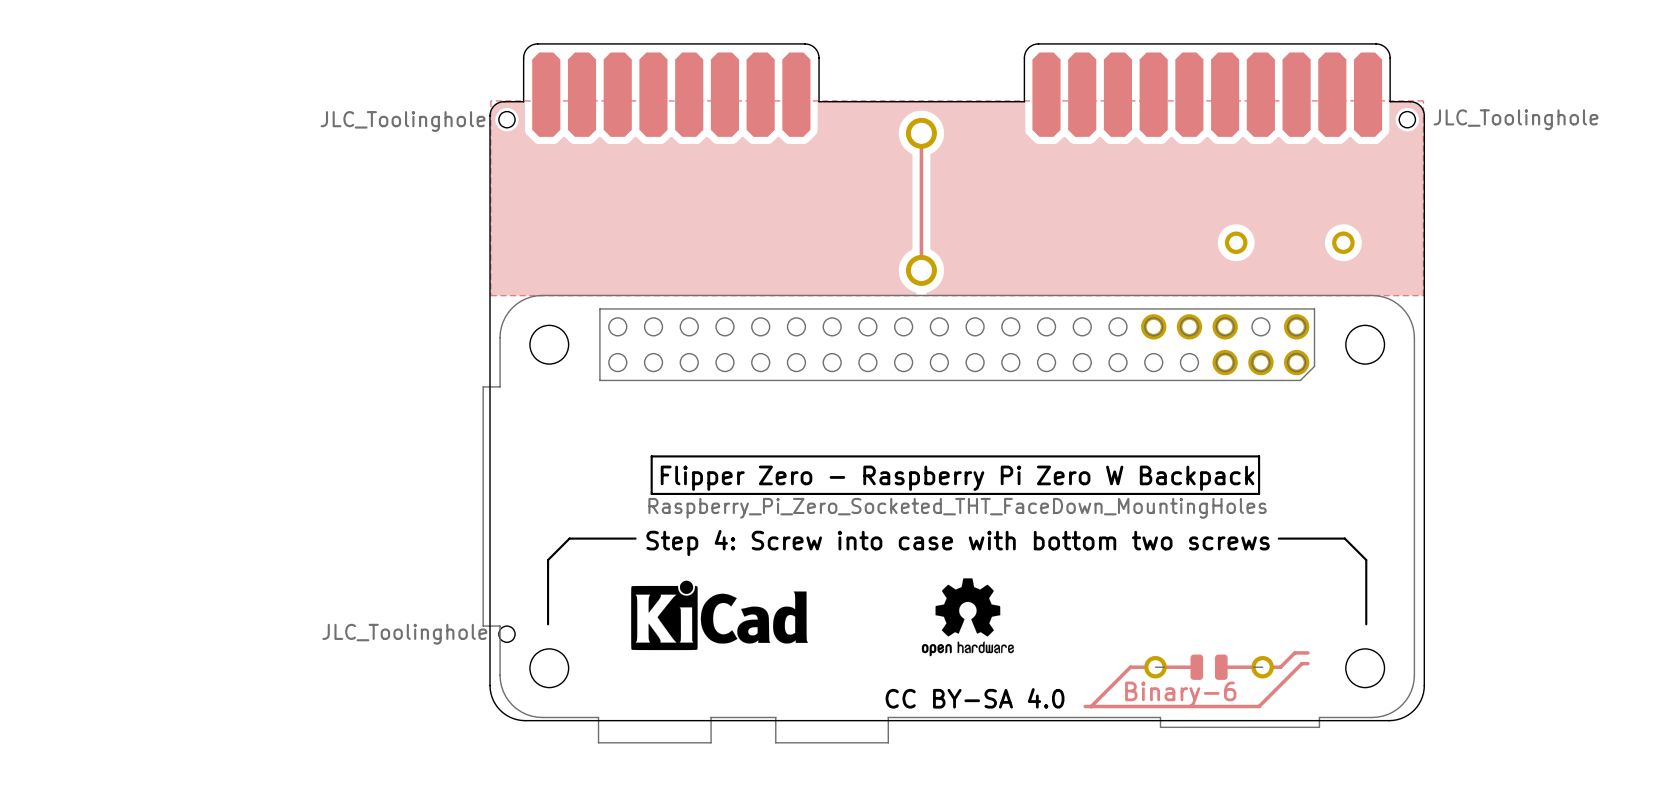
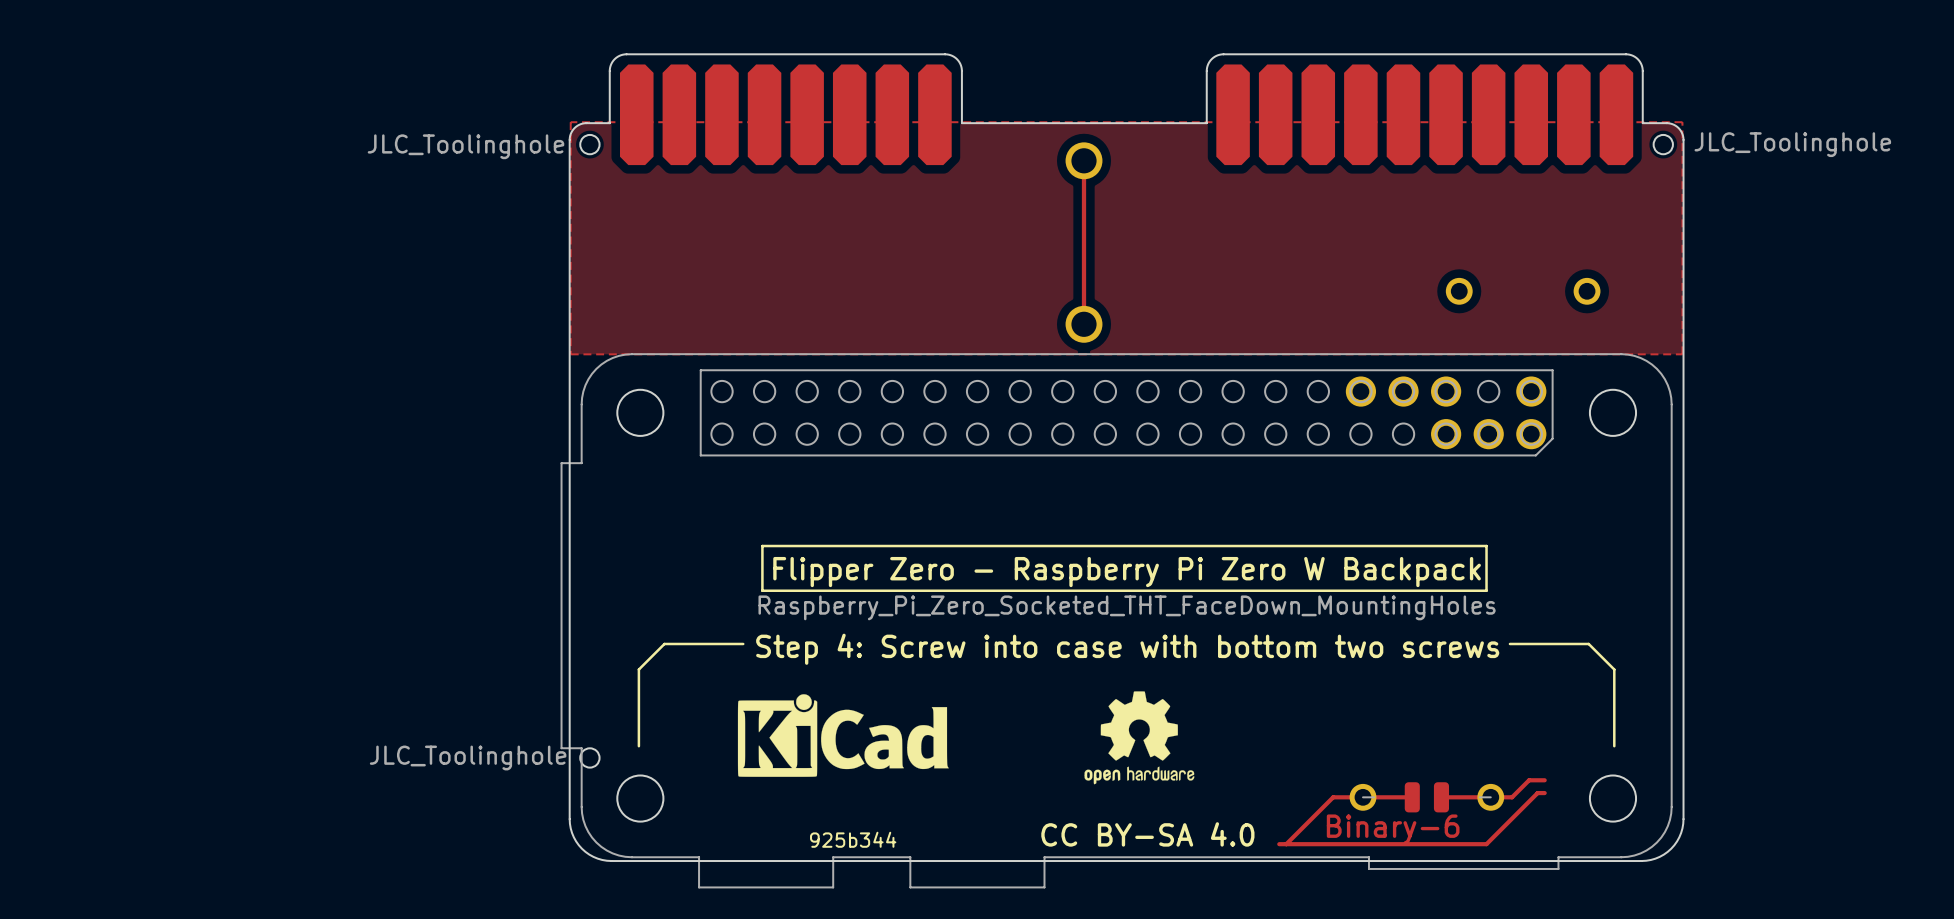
text: none -> 925b344 (853, 839)

